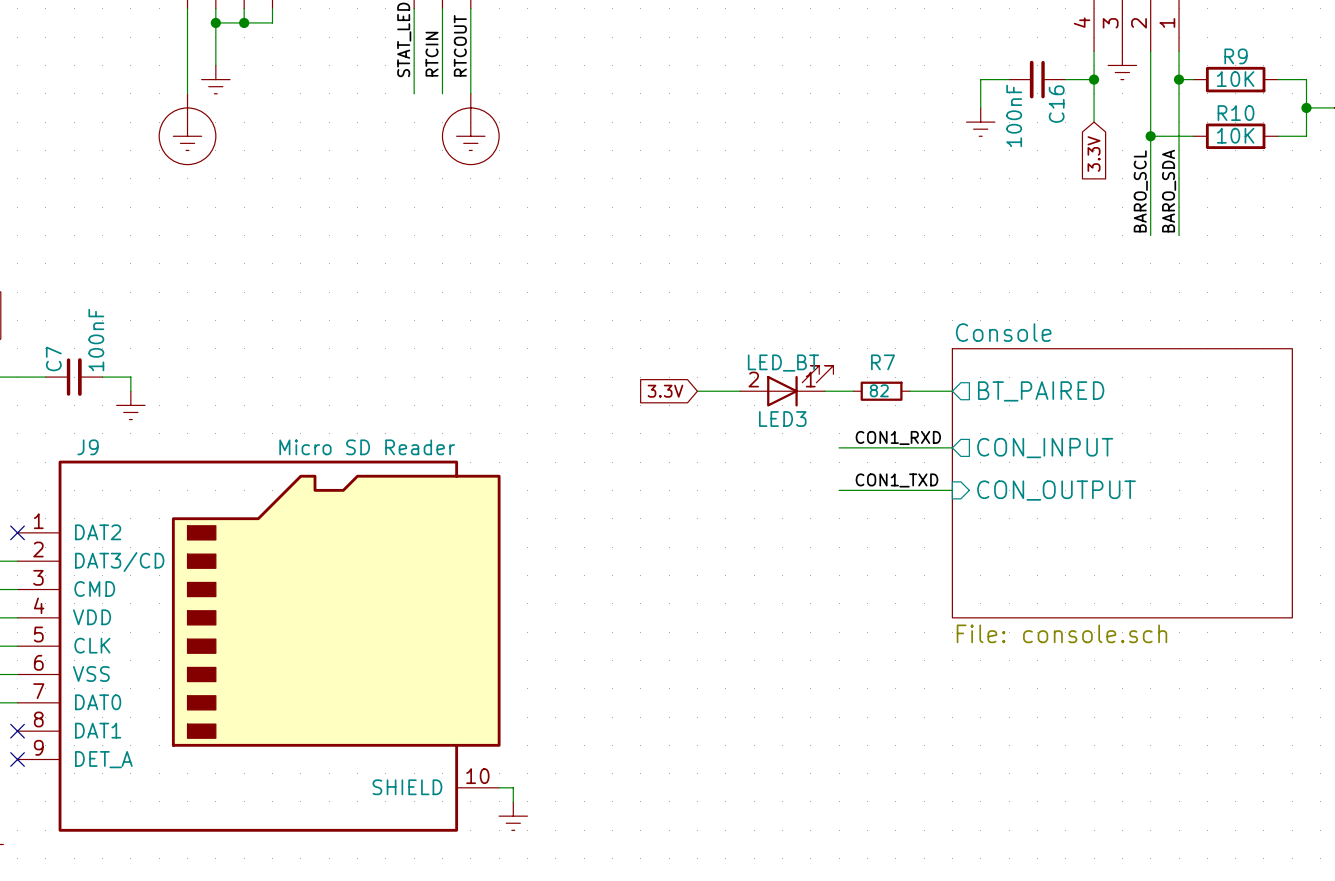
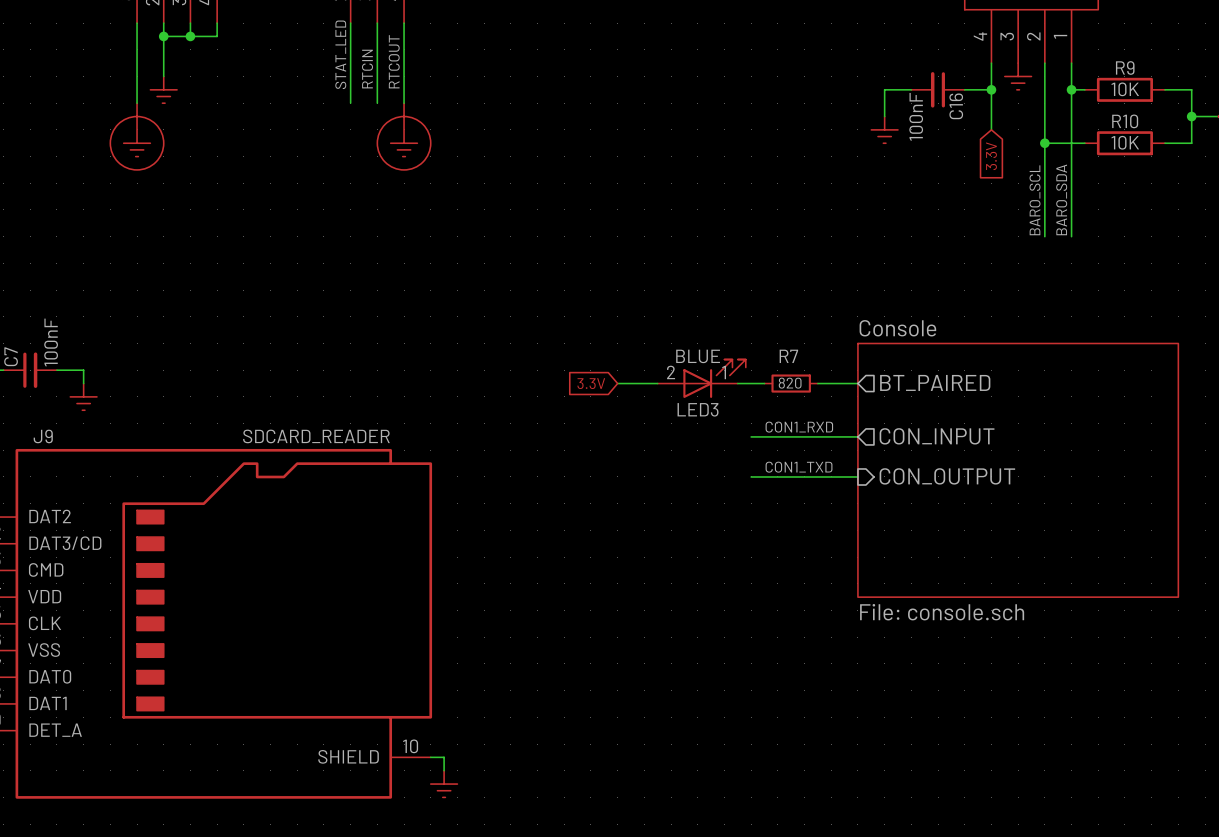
LED3 value: LED_BT (783, 363) -> BLUE (698, 356)
R7 value: 82 (879, 390) -> 820 (790, 383)
J9 value: Micro SD Reader (367, 447) -> SDCARD_READER (316, 436)

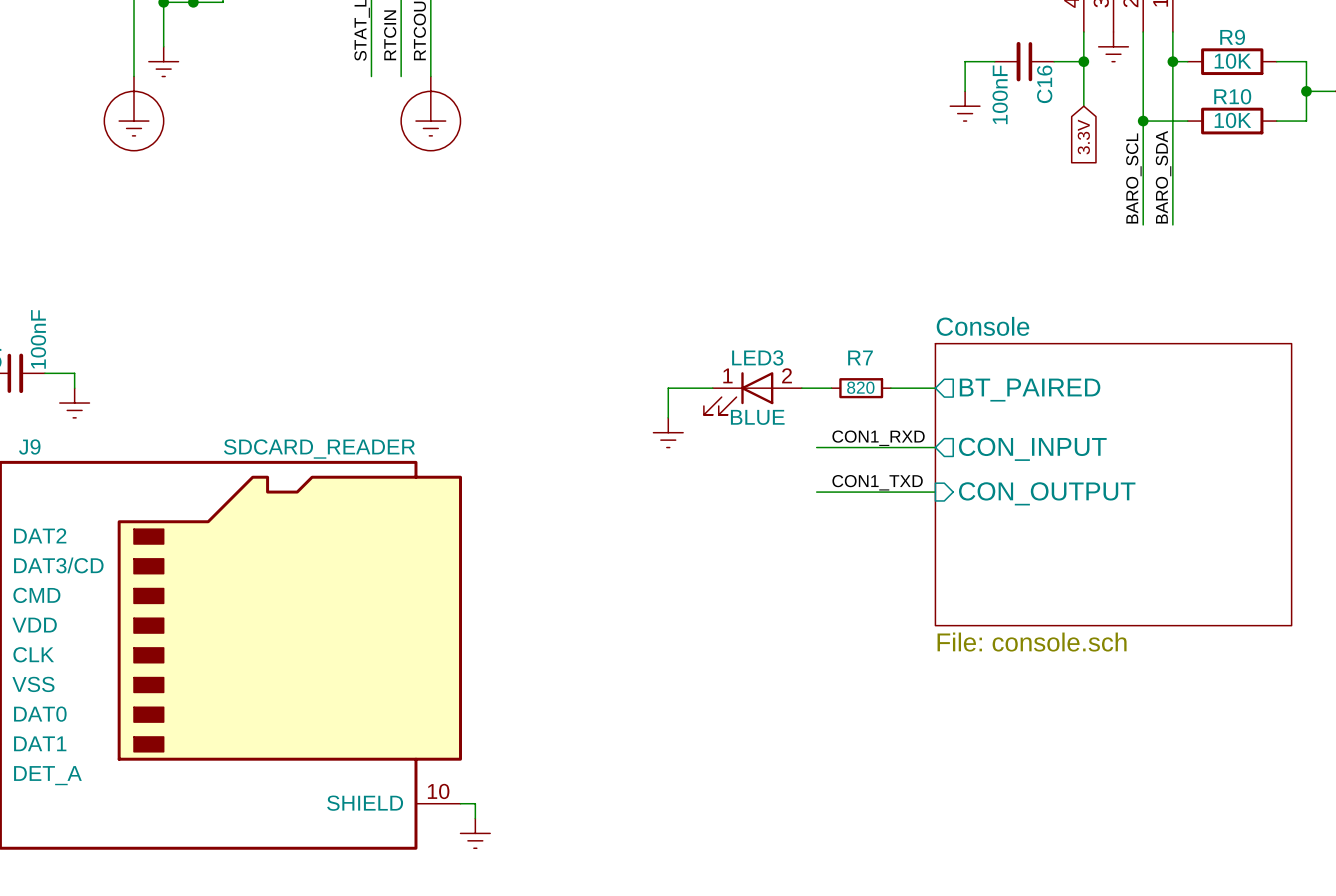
LED3 rotation: 0° (714, 378) -> 180° (738, 393)
global label: 3.3V (591, 383) -> none
wire: none -> (668, 388) (668, 417)
power symbol: none -> (668, 432)

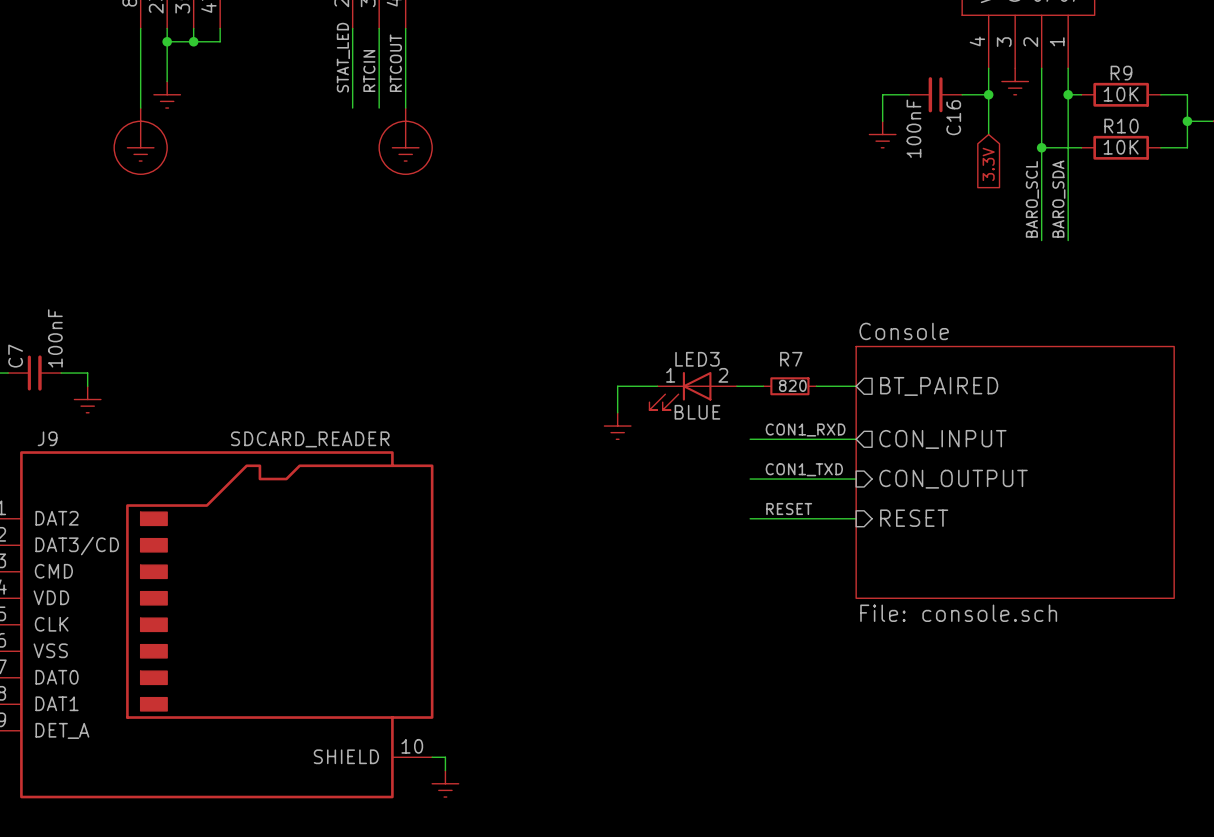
label: none -> RESET (789, 508)
sheet pin: none -> RESET (914, 518)
wire: none -> (750, 518) (856, 518)

